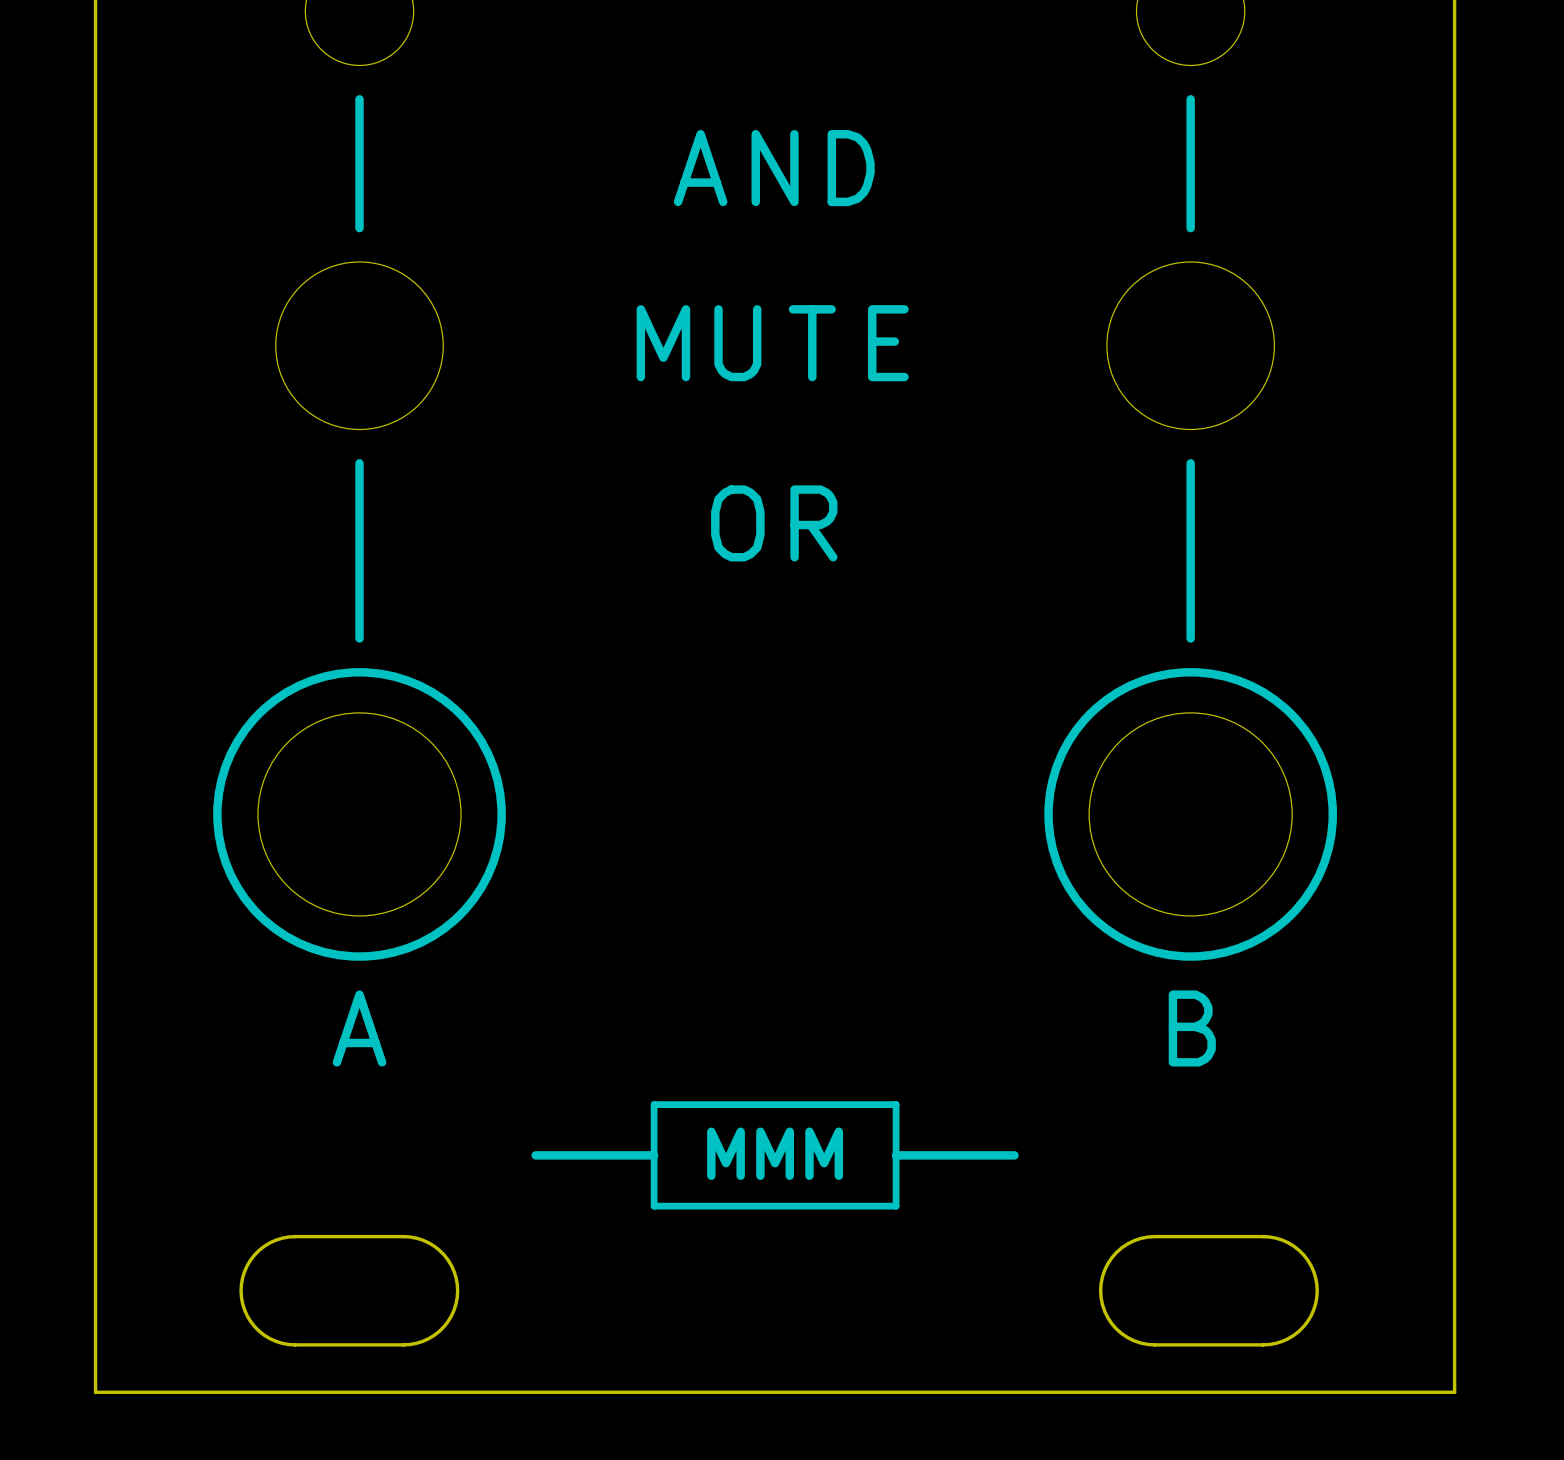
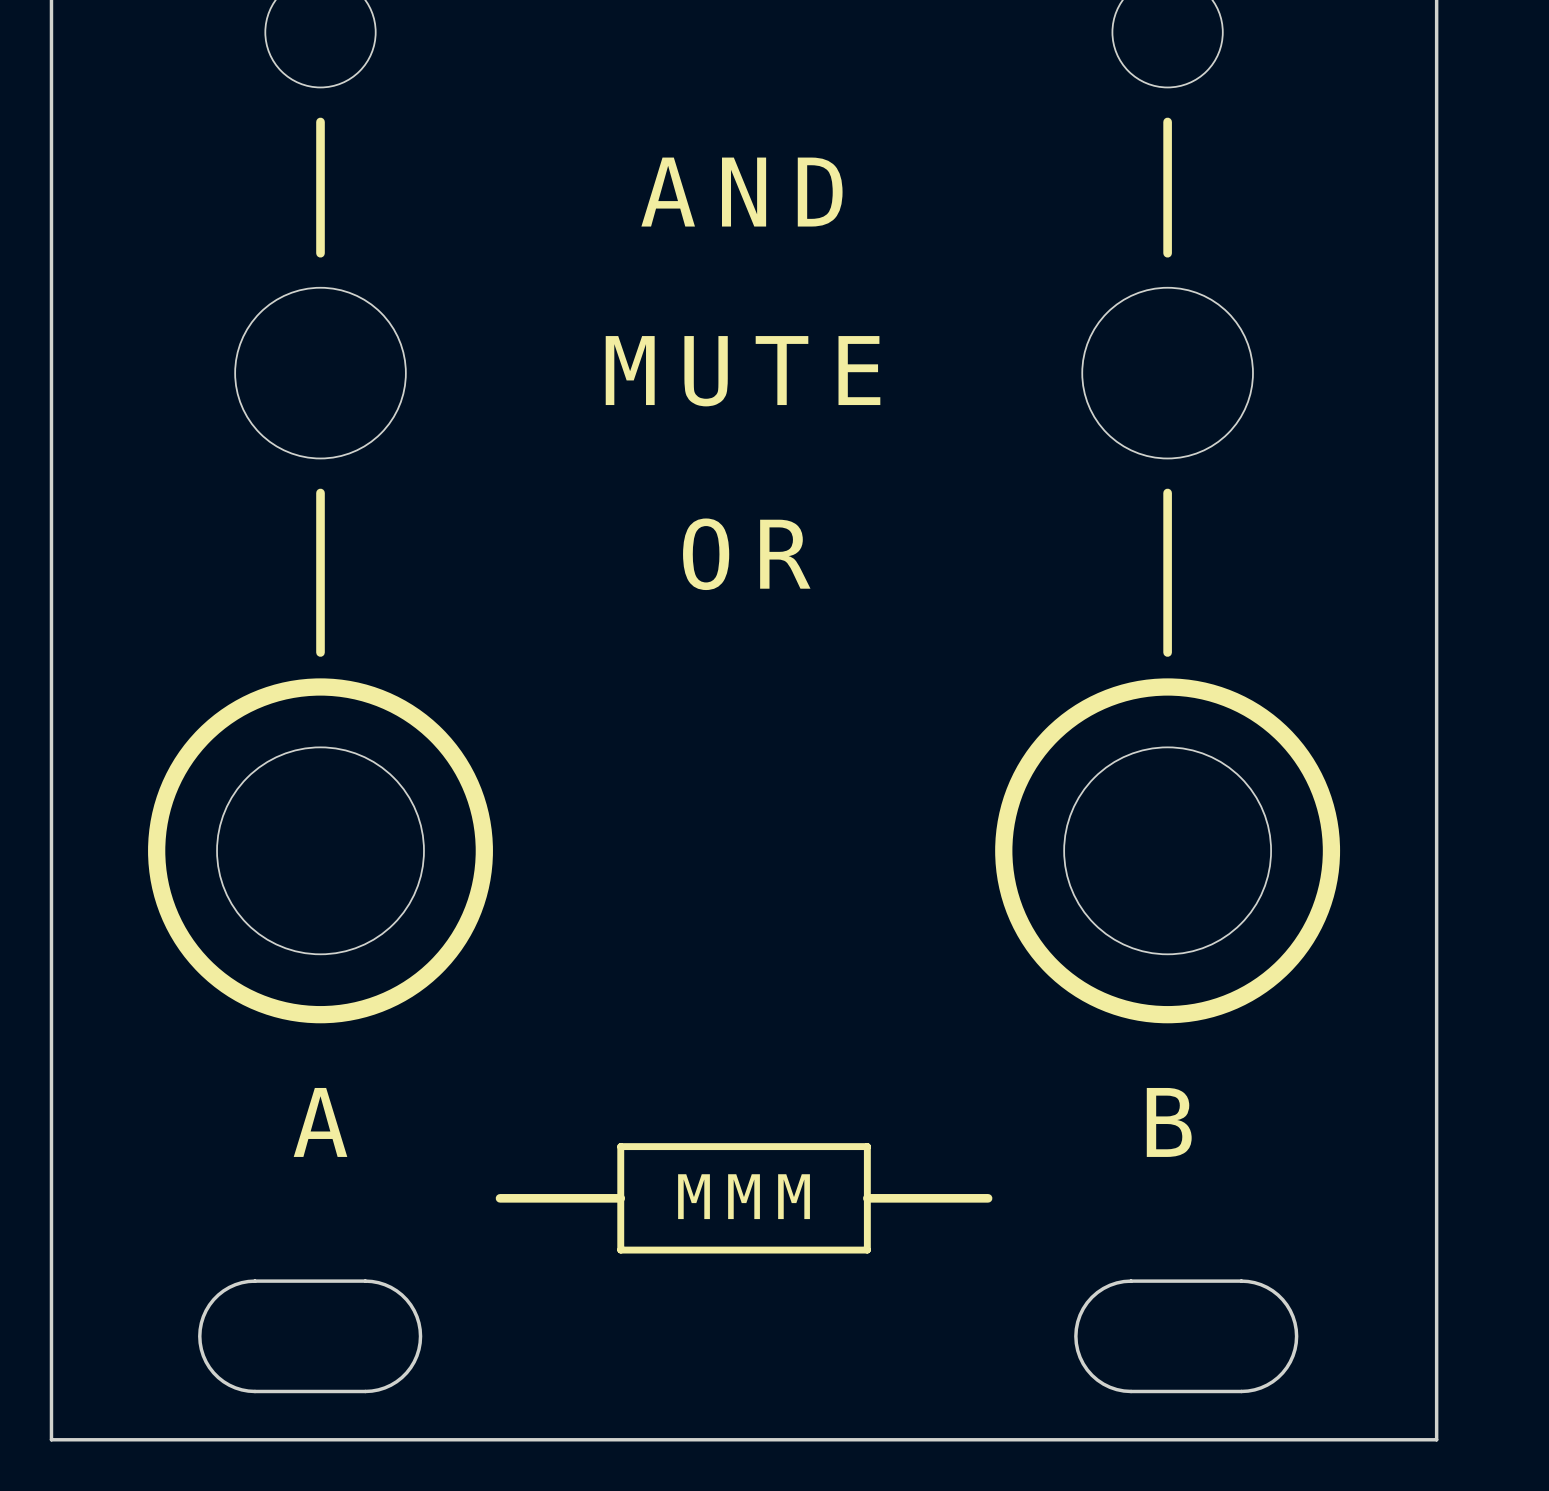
line: (359, 619) (359, 638) -> none
line: (1190, 619) (1190, 638) -> none
drawing shape: [213, 668, 506, 961] -> [148, 678, 493, 1024]
drawing shape: [1044, 668, 1338, 961] -> [995, 678, 1341, 1024]
text position: A (359, 1028) -> A (320, 1122)
text position: B (1192, 1028) -> B (1169, 1122)

